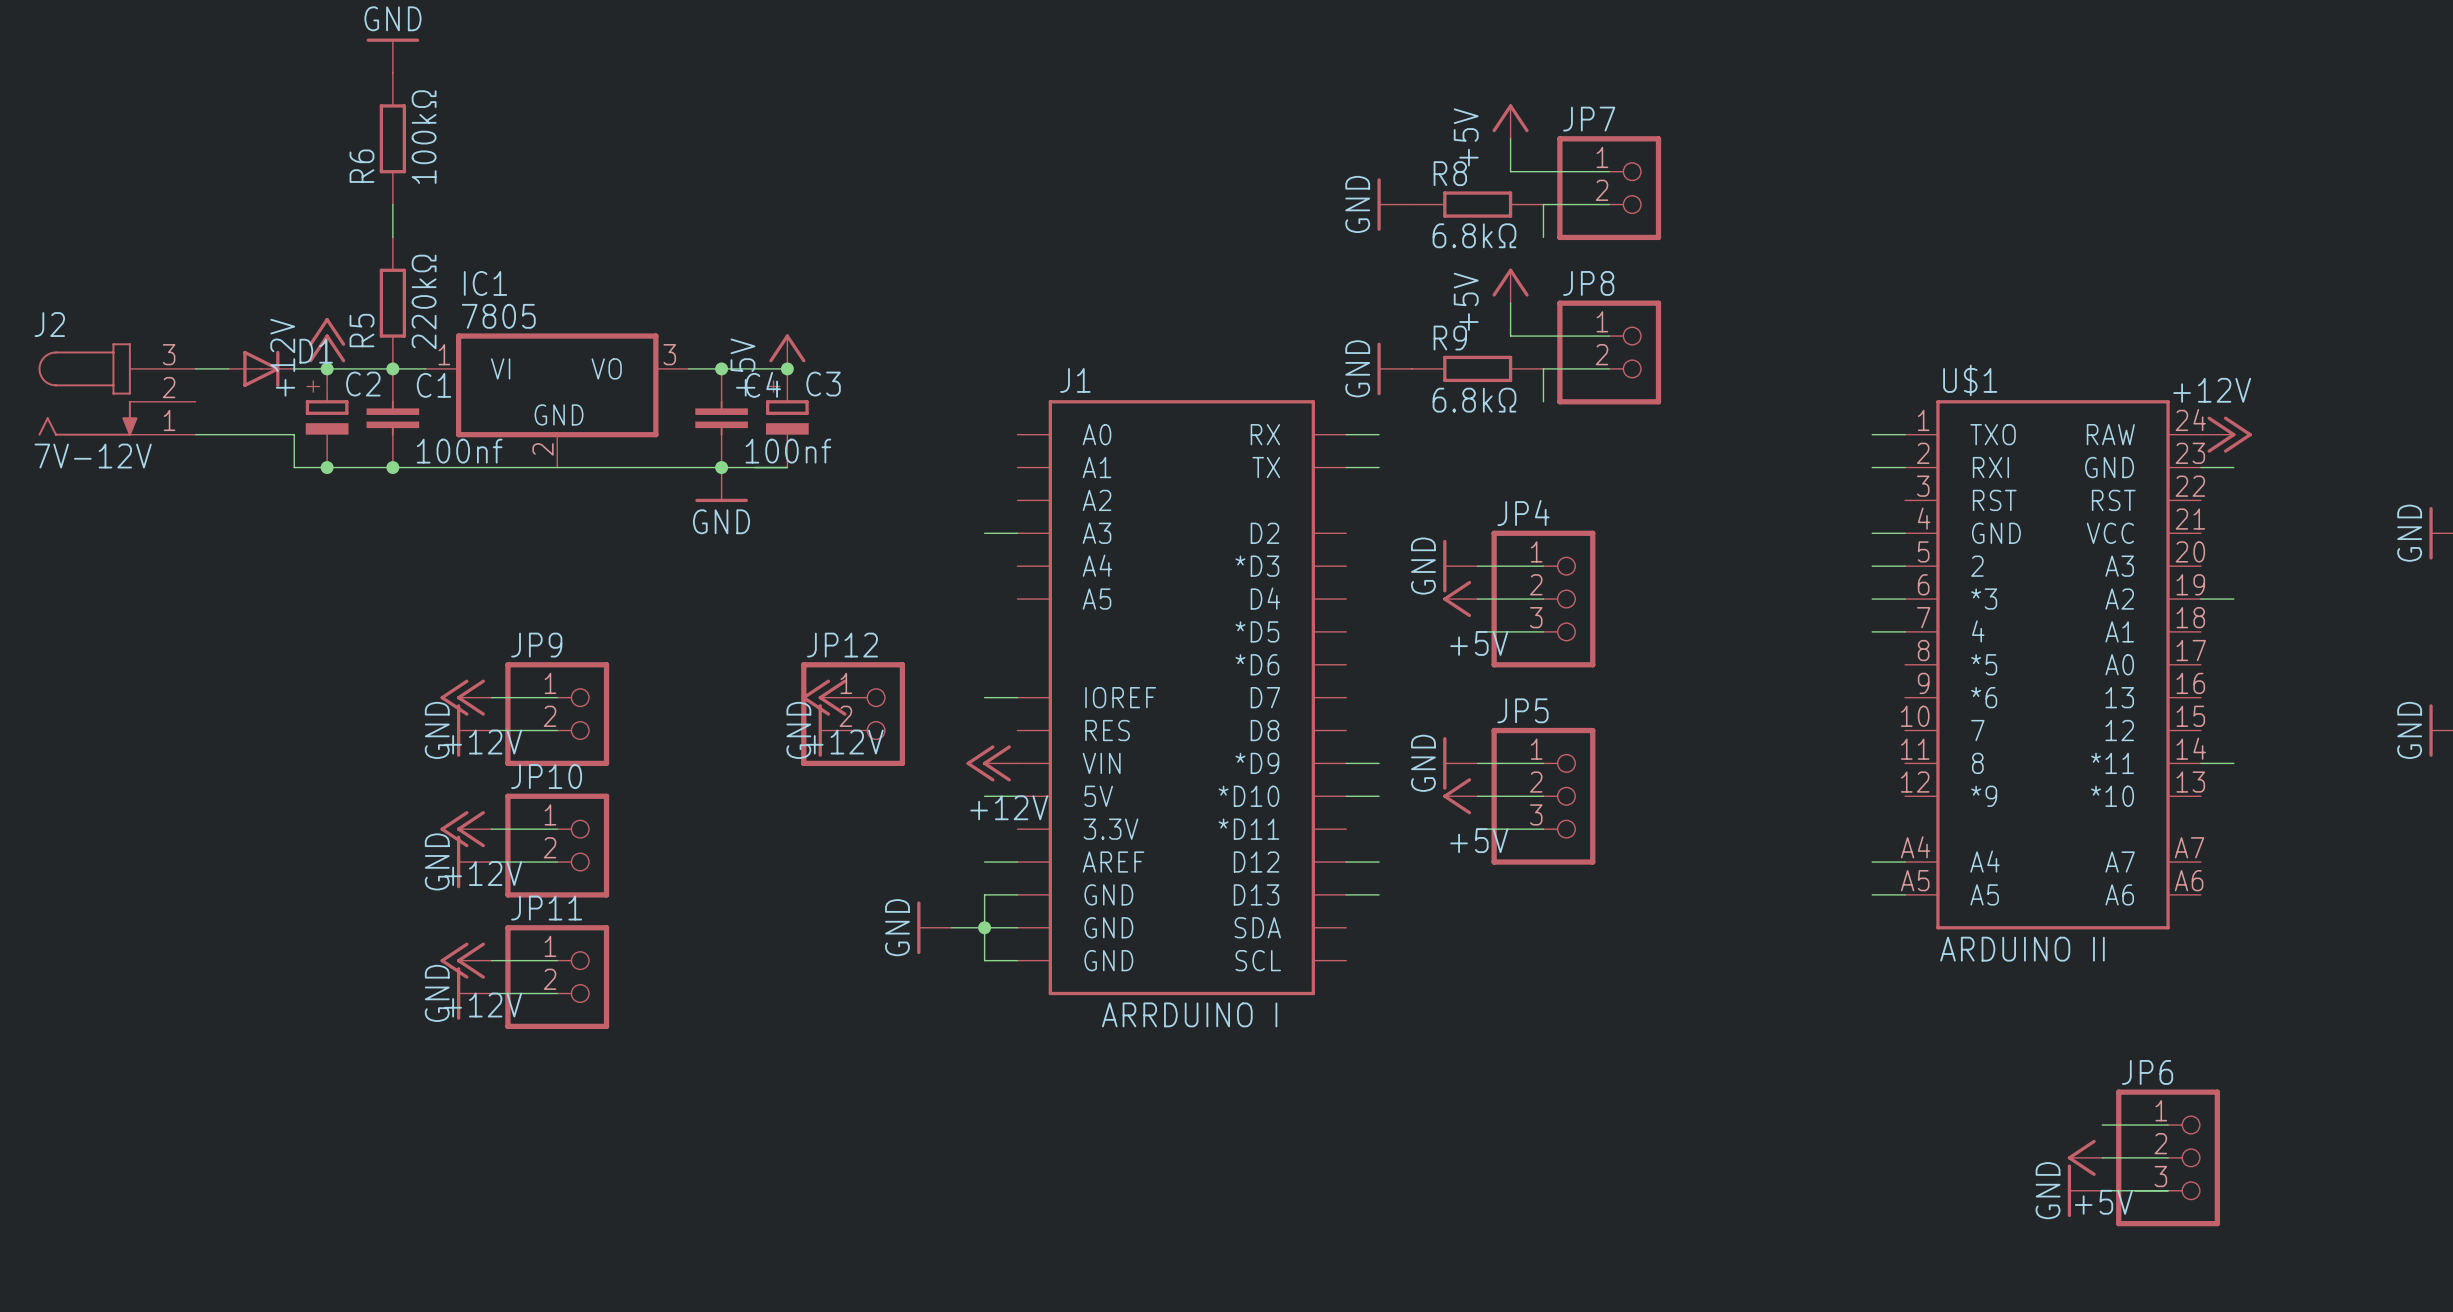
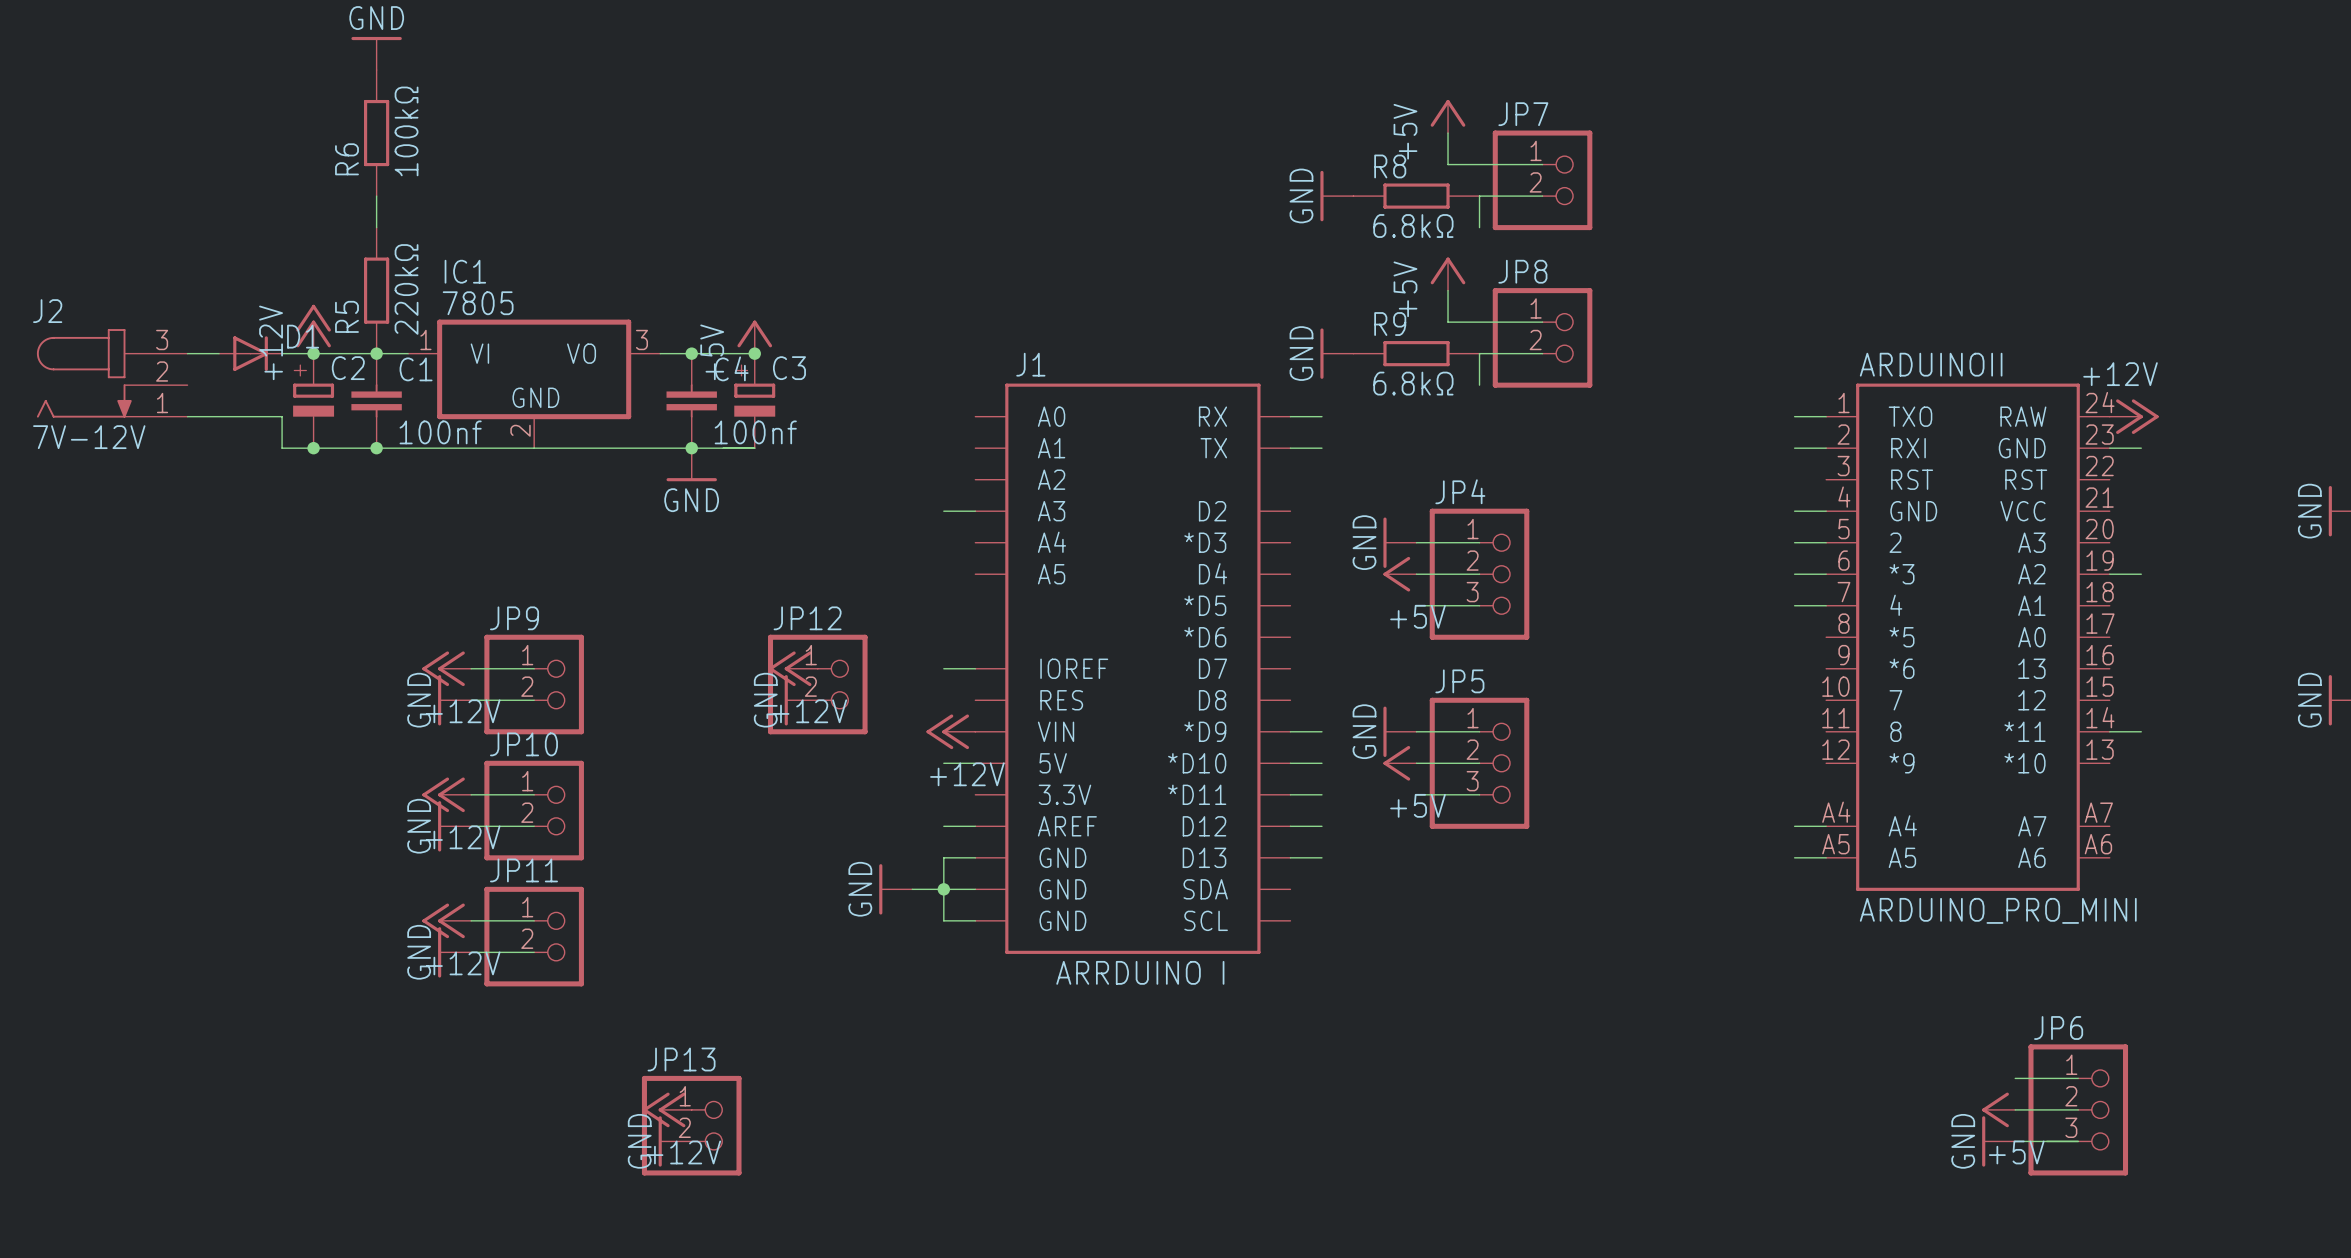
U$1 name: U$1 (1970, 380) -> ARDUINOII (1931, 364)
wire: none -> (1290, 794) (1321, 794)
U$1 value: ARDUINO II (2022, 949) -> ARDUINO_PRO_MINI (1998, 910)
power symbol: none -> +12V (667, 1109)
JP13: none -> (691, 1125)
power symbol: none -> GND (675, 1141)

